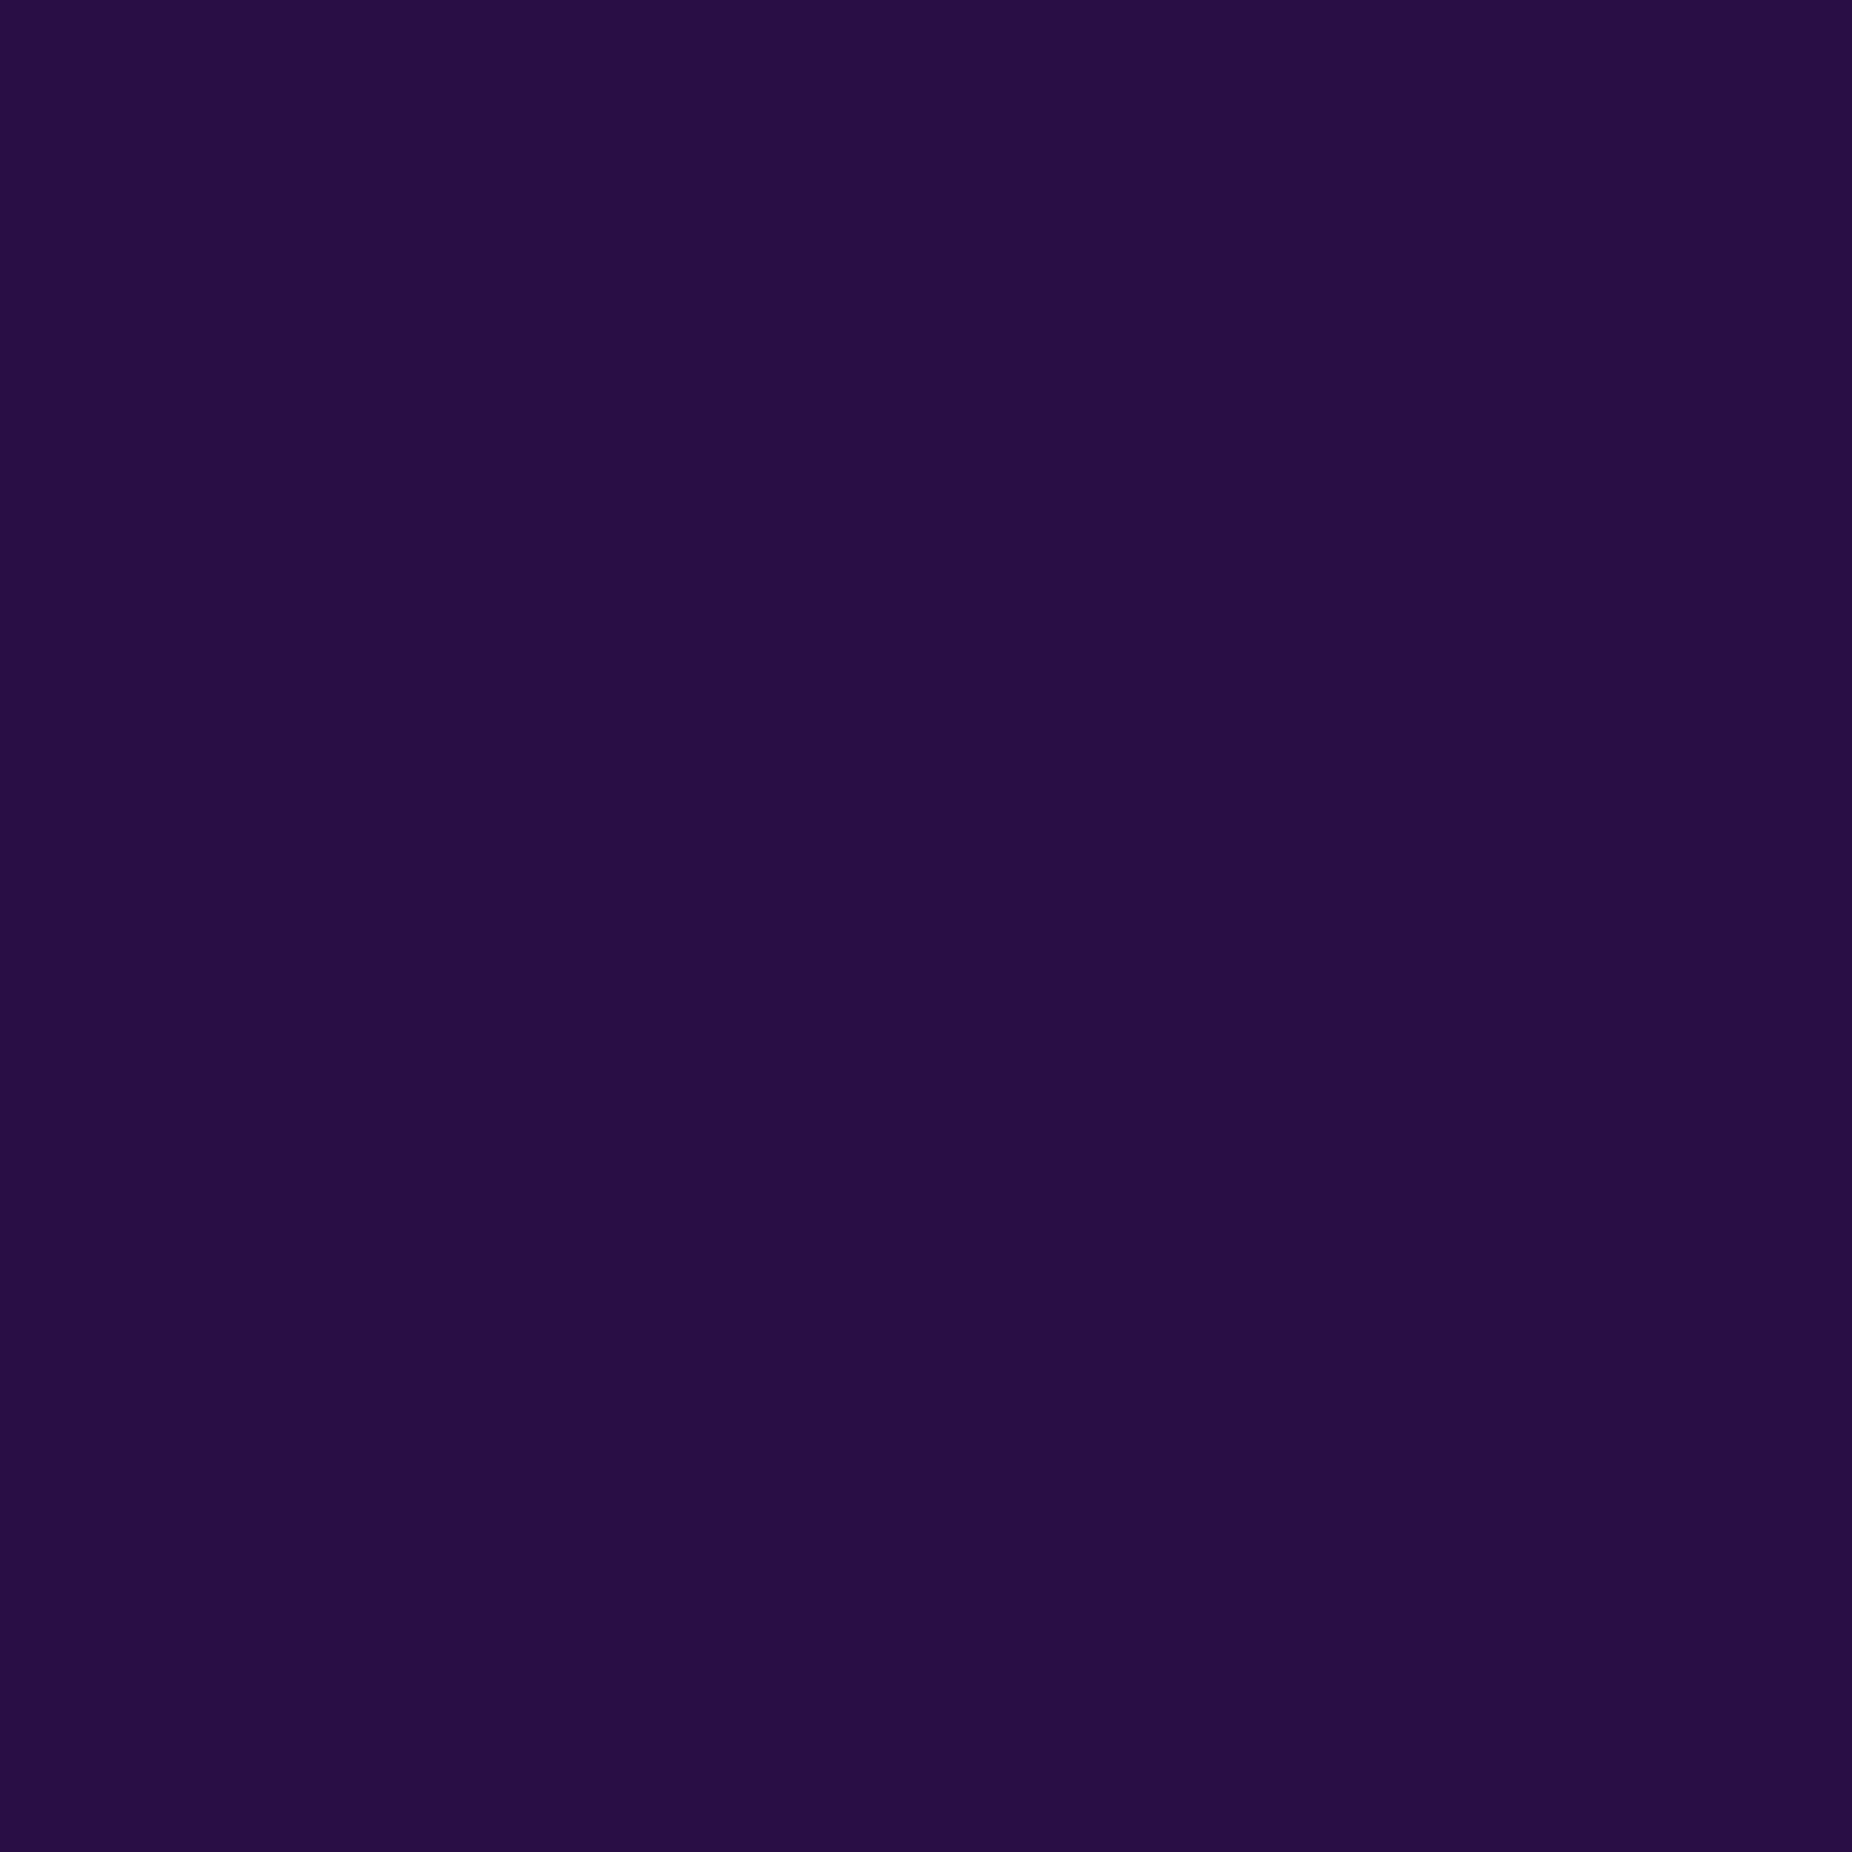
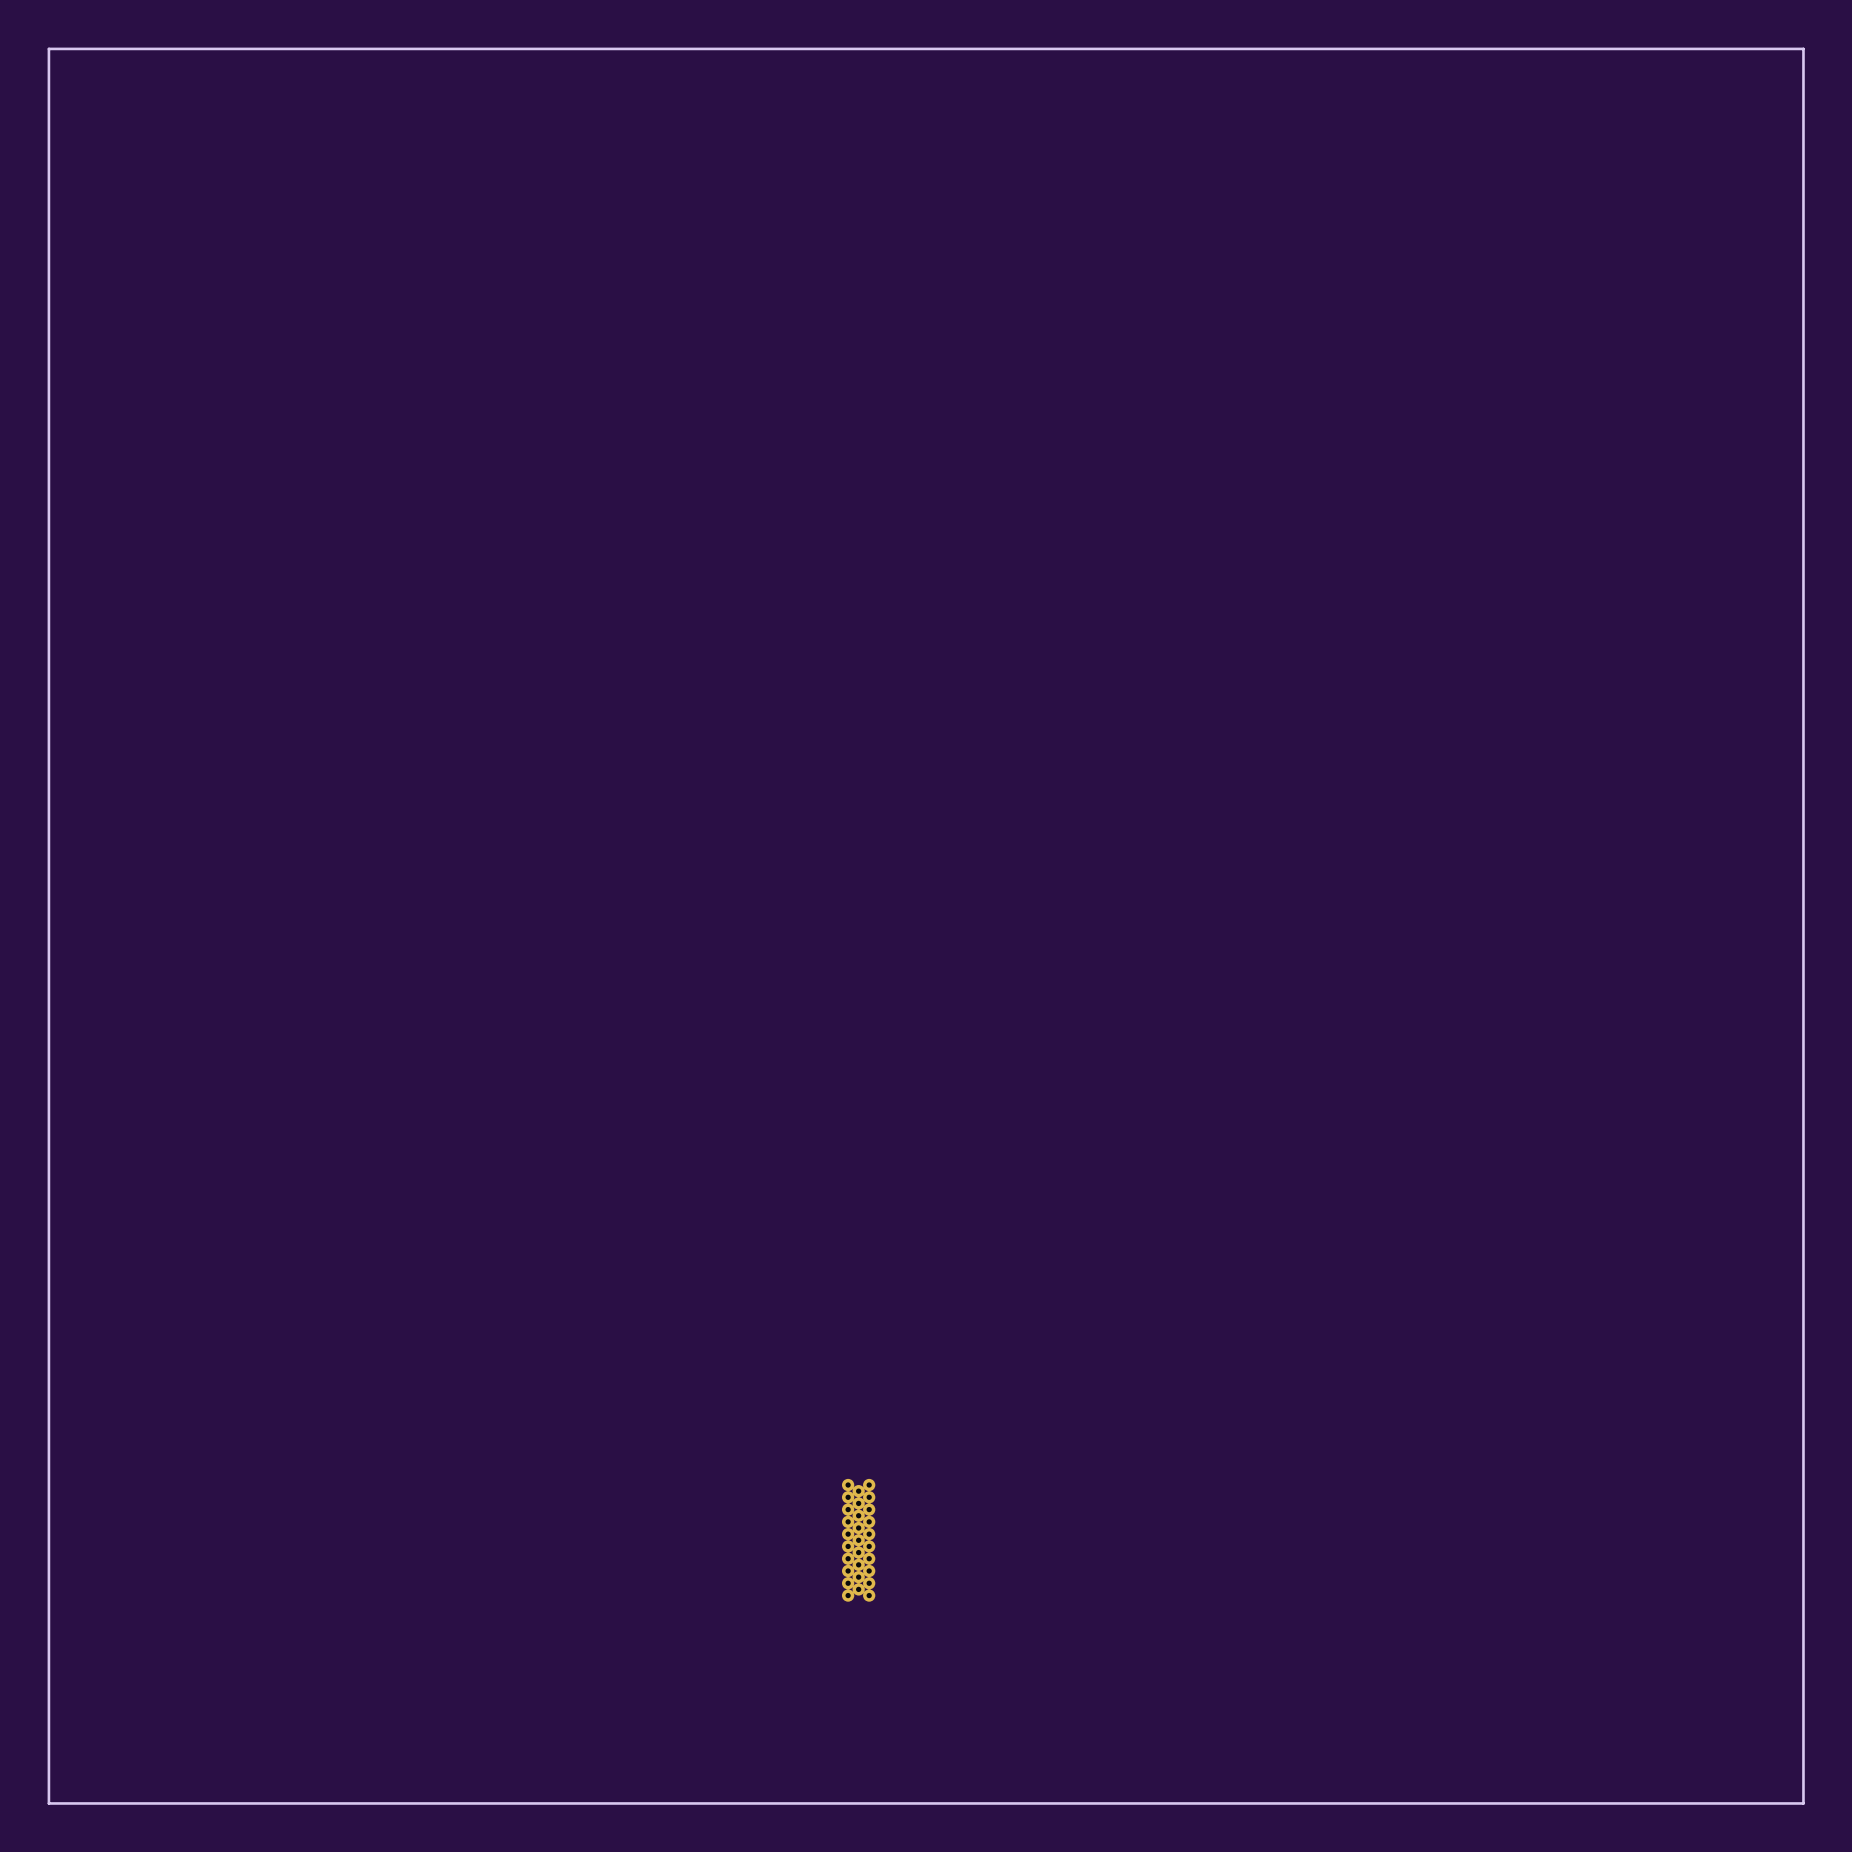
board edge: none -> (1803, 48) (48, 48) (48, 1803) (1803, 1803) (1803, 48)
part: none -> (858, 1540)

